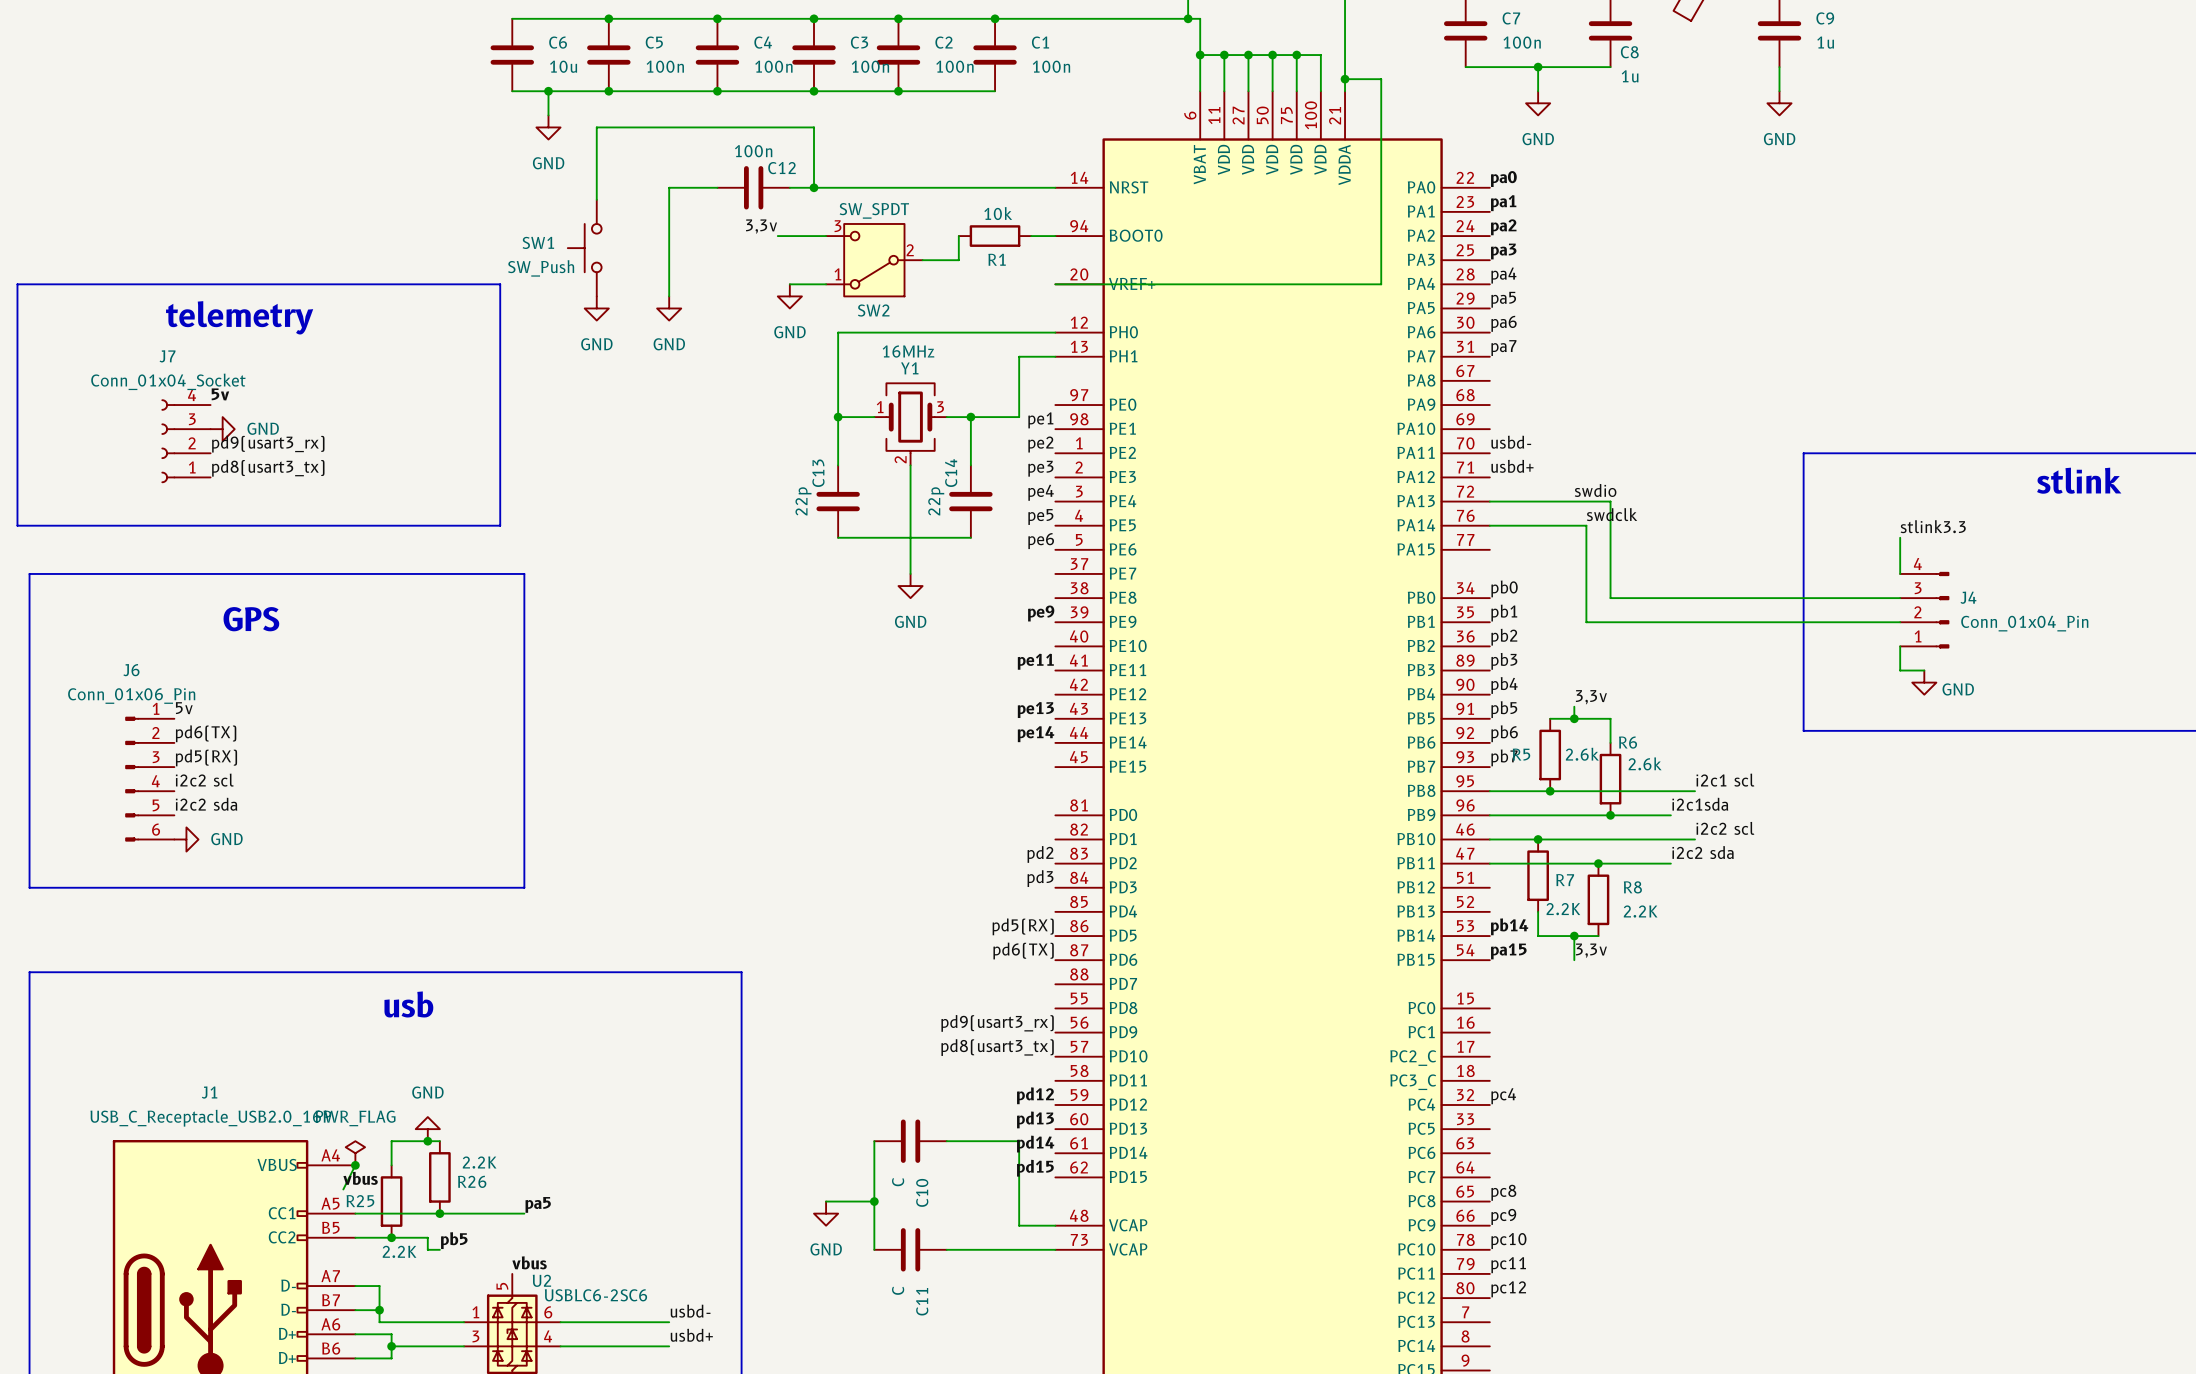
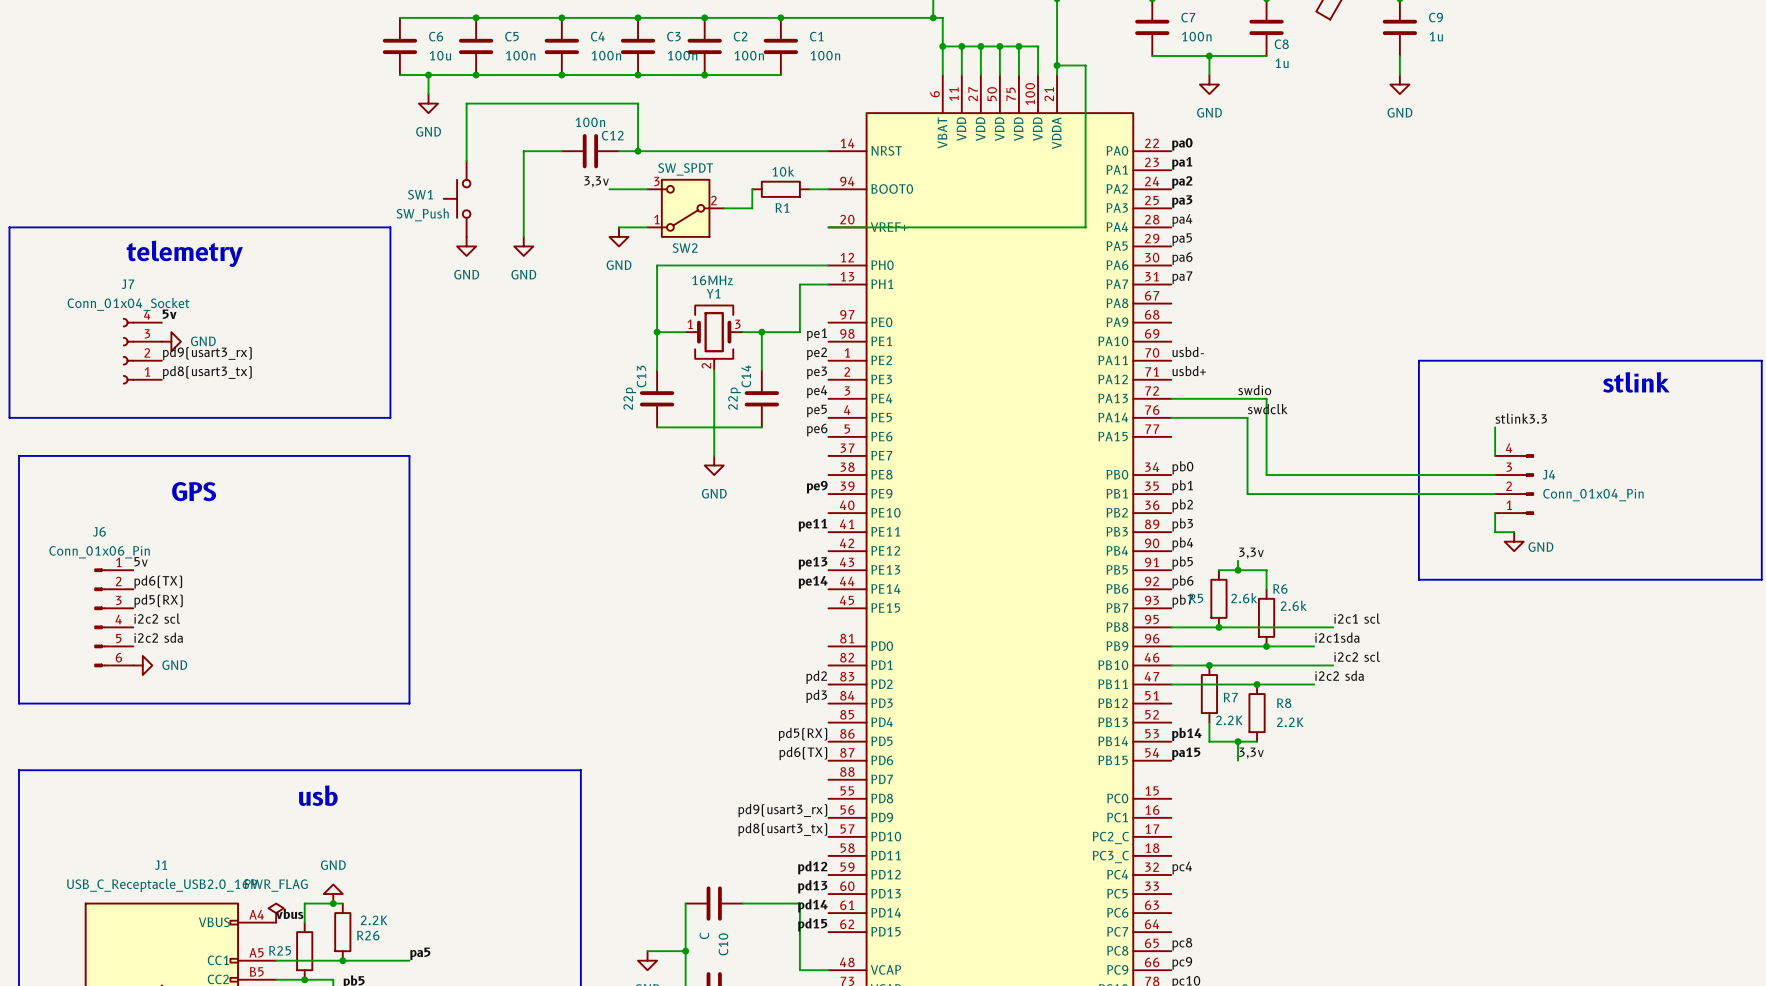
wire: (355, 1165) (343, 1189) -> none
junction: (355, 1165) -> none
label position: vbus (360, 1178) -> vbus (289, 913)

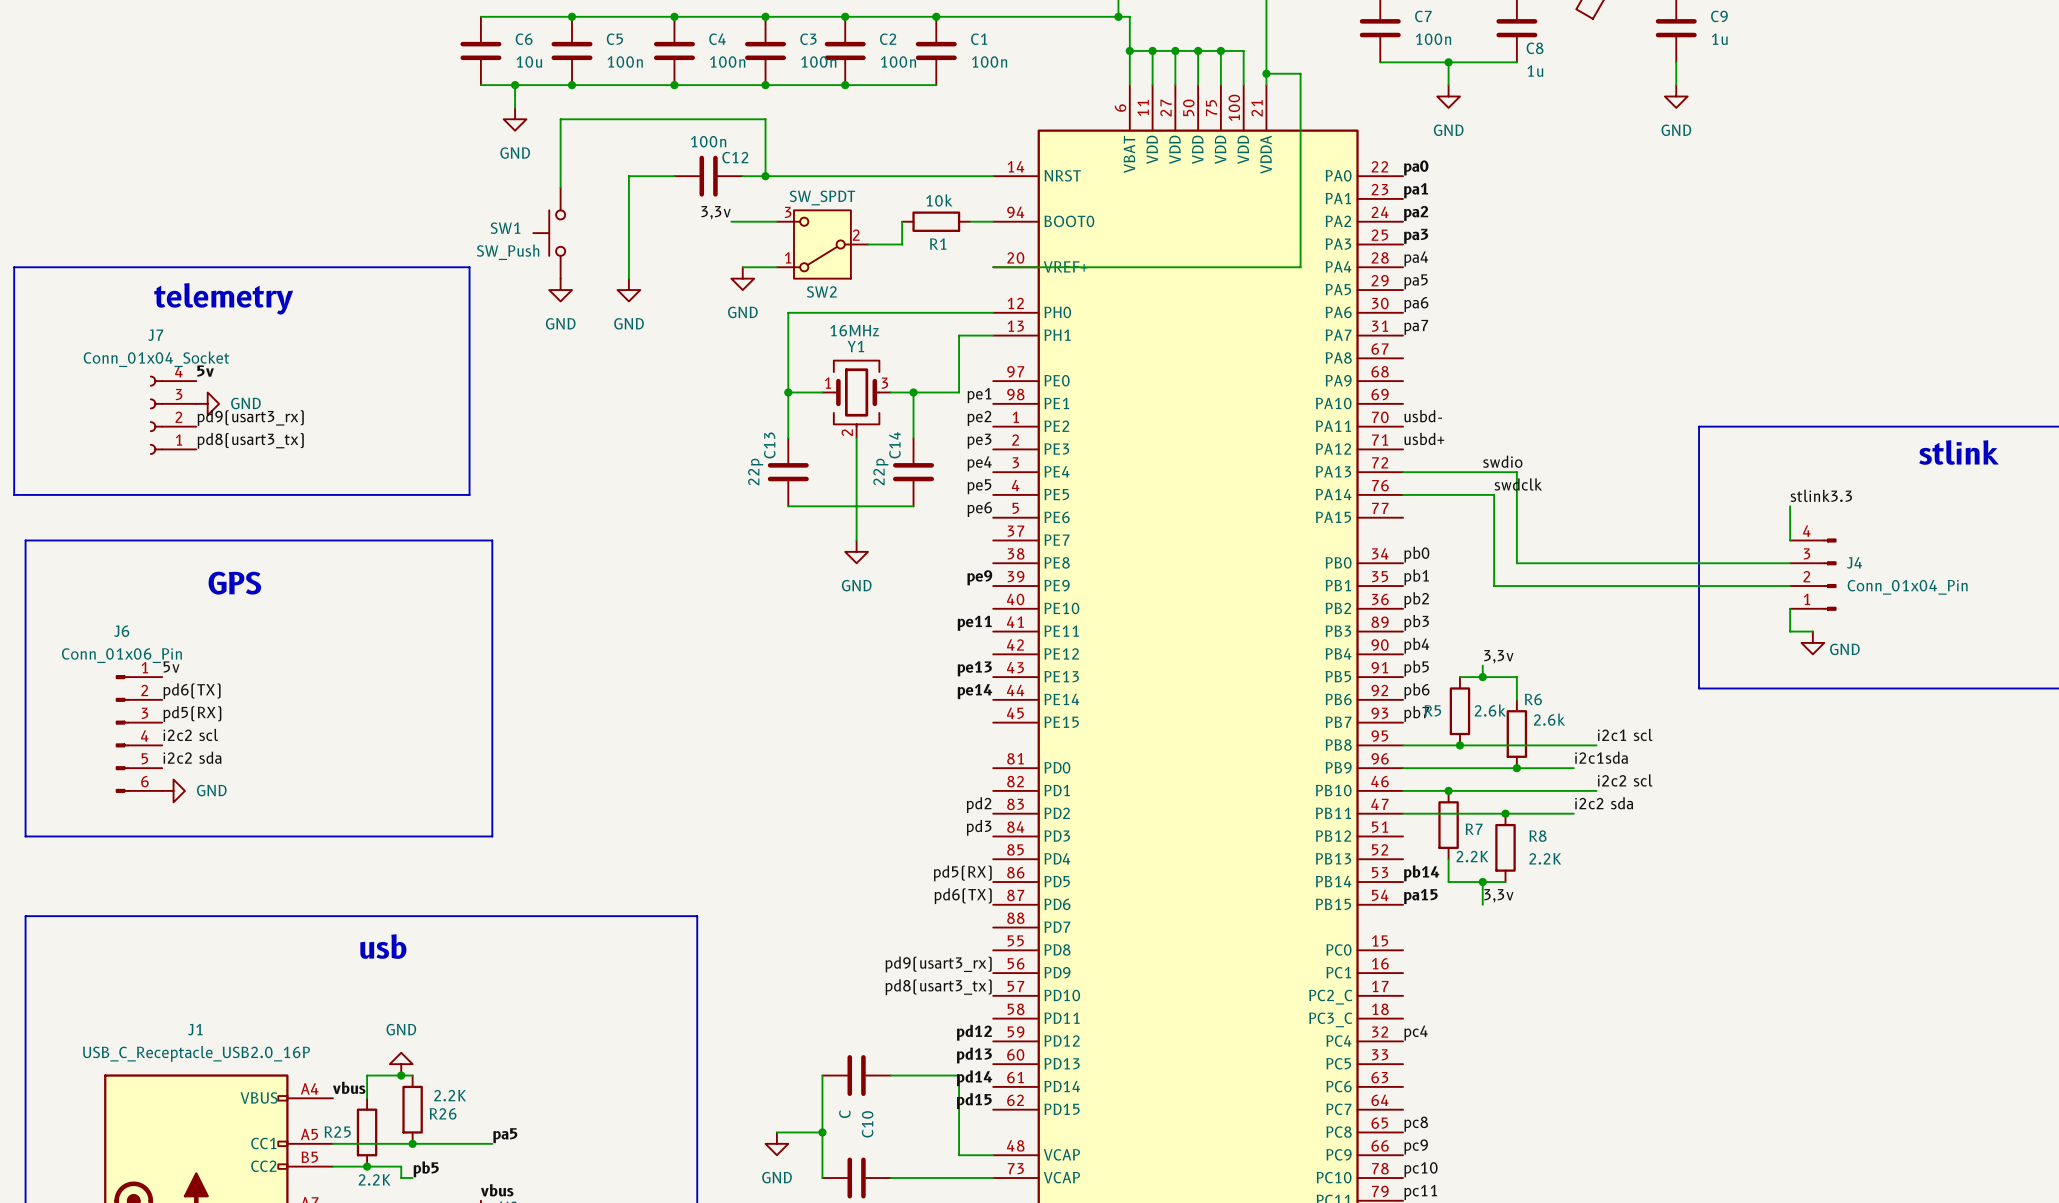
power symbol: PWR_FLAG (276, 913) -> none

